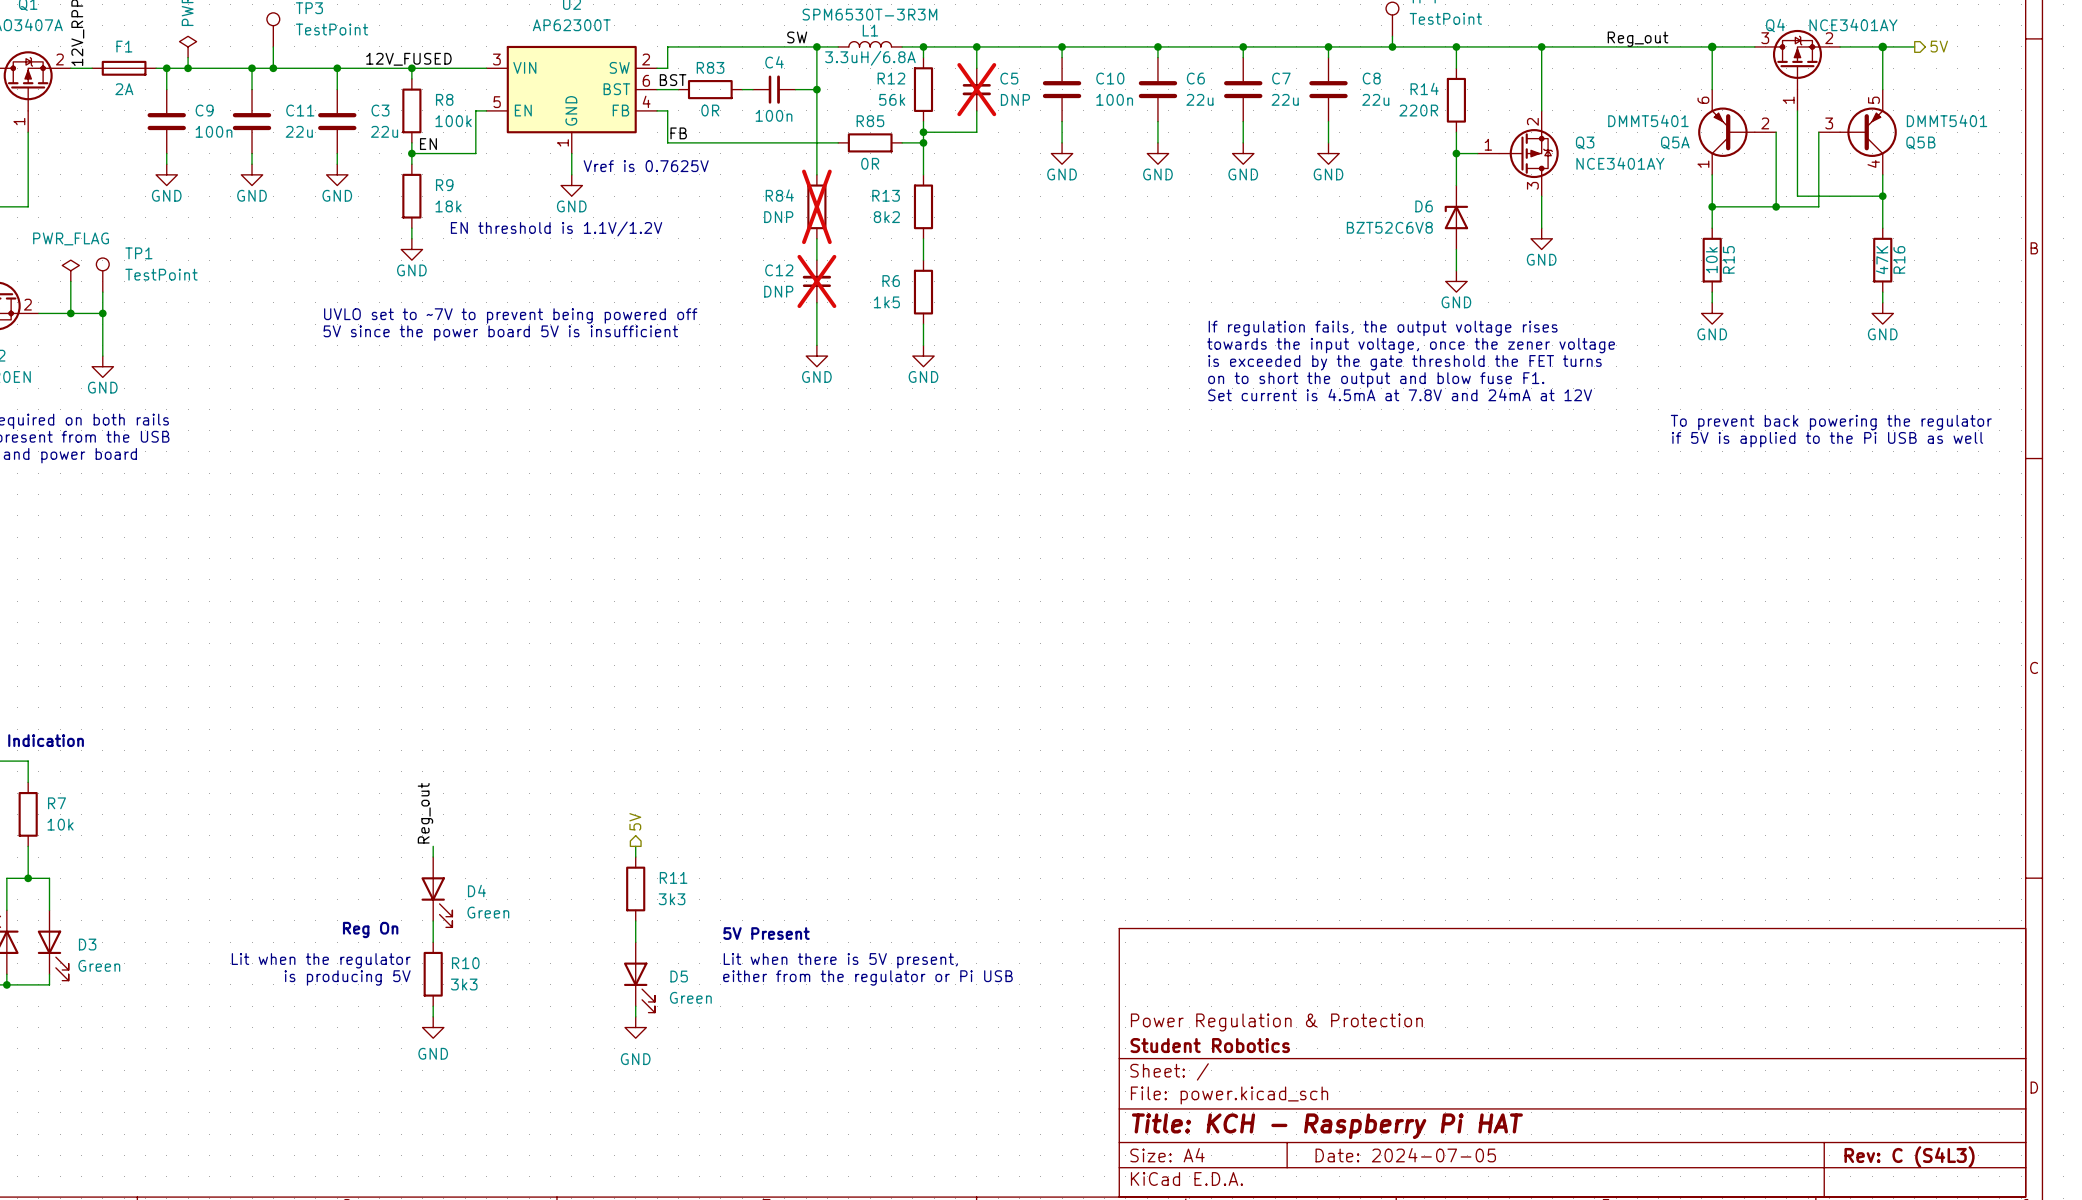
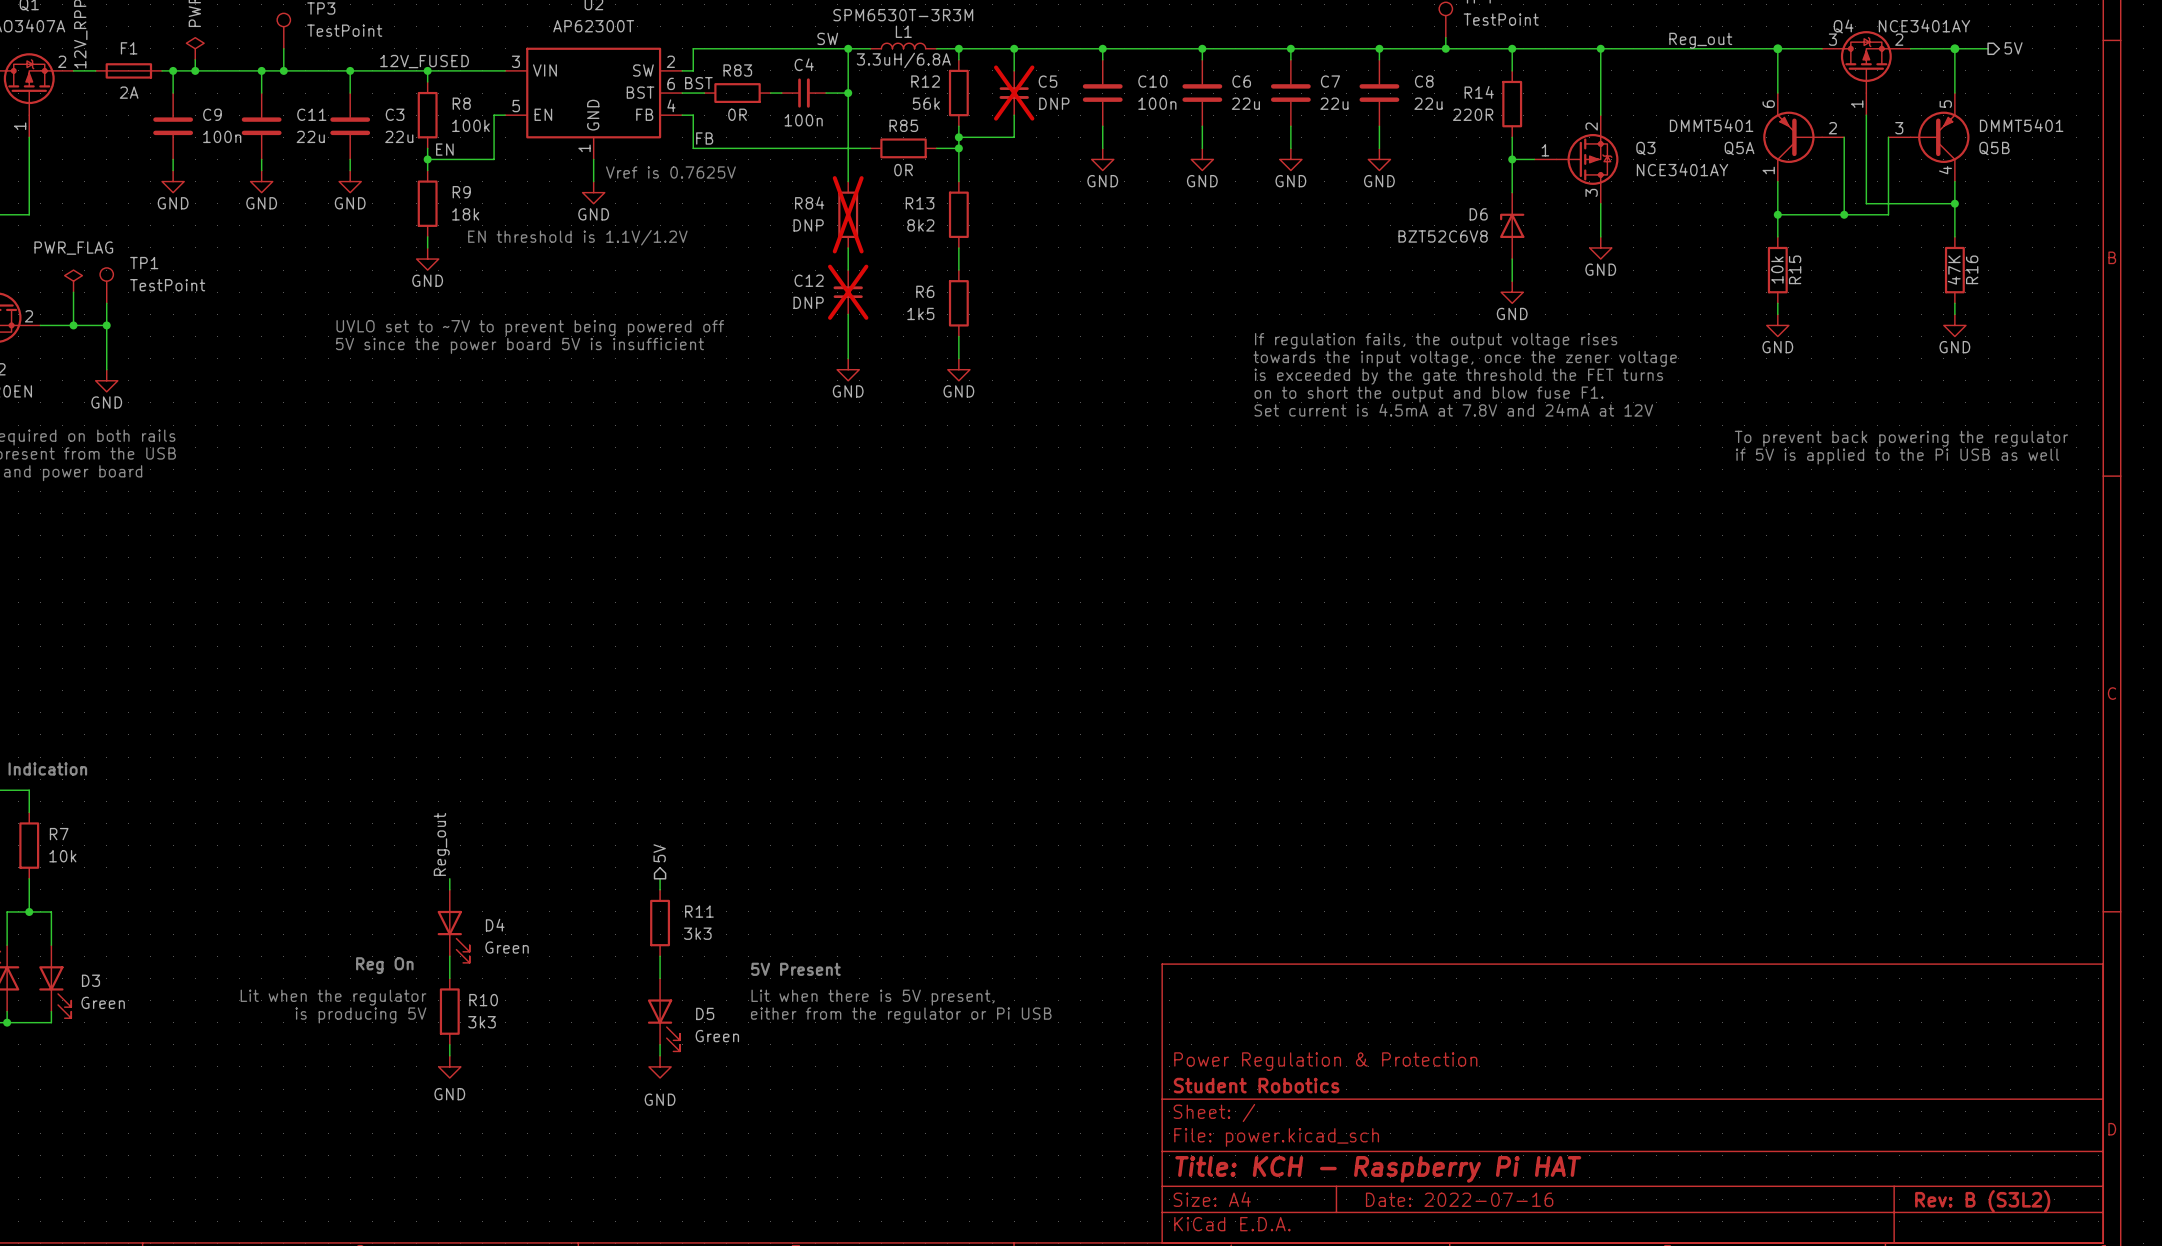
title block: Date: 2024-07-05 (1405, 1155) -> Date: 2022-07-16 (1459, 1199)
title block: Rev: C (S4L3) (1909, 1156) -> Rev: B (S3L2) (1982, 1201)

